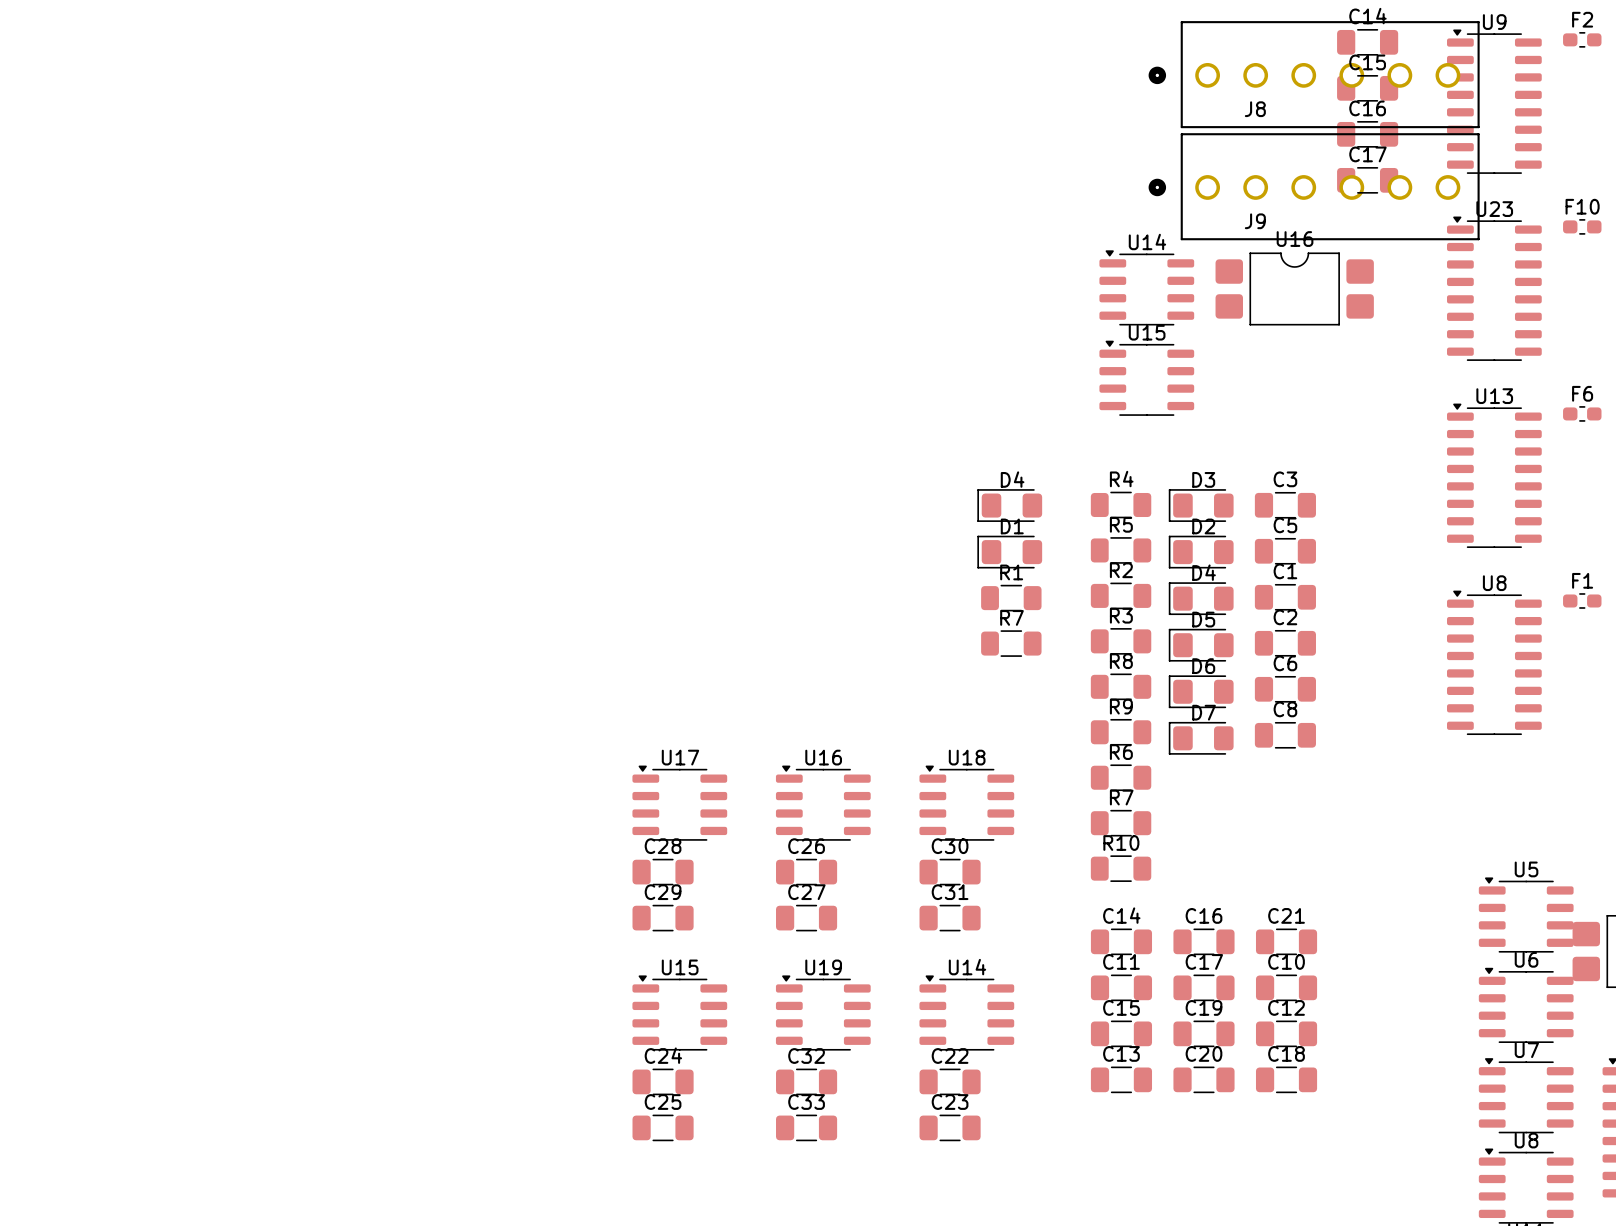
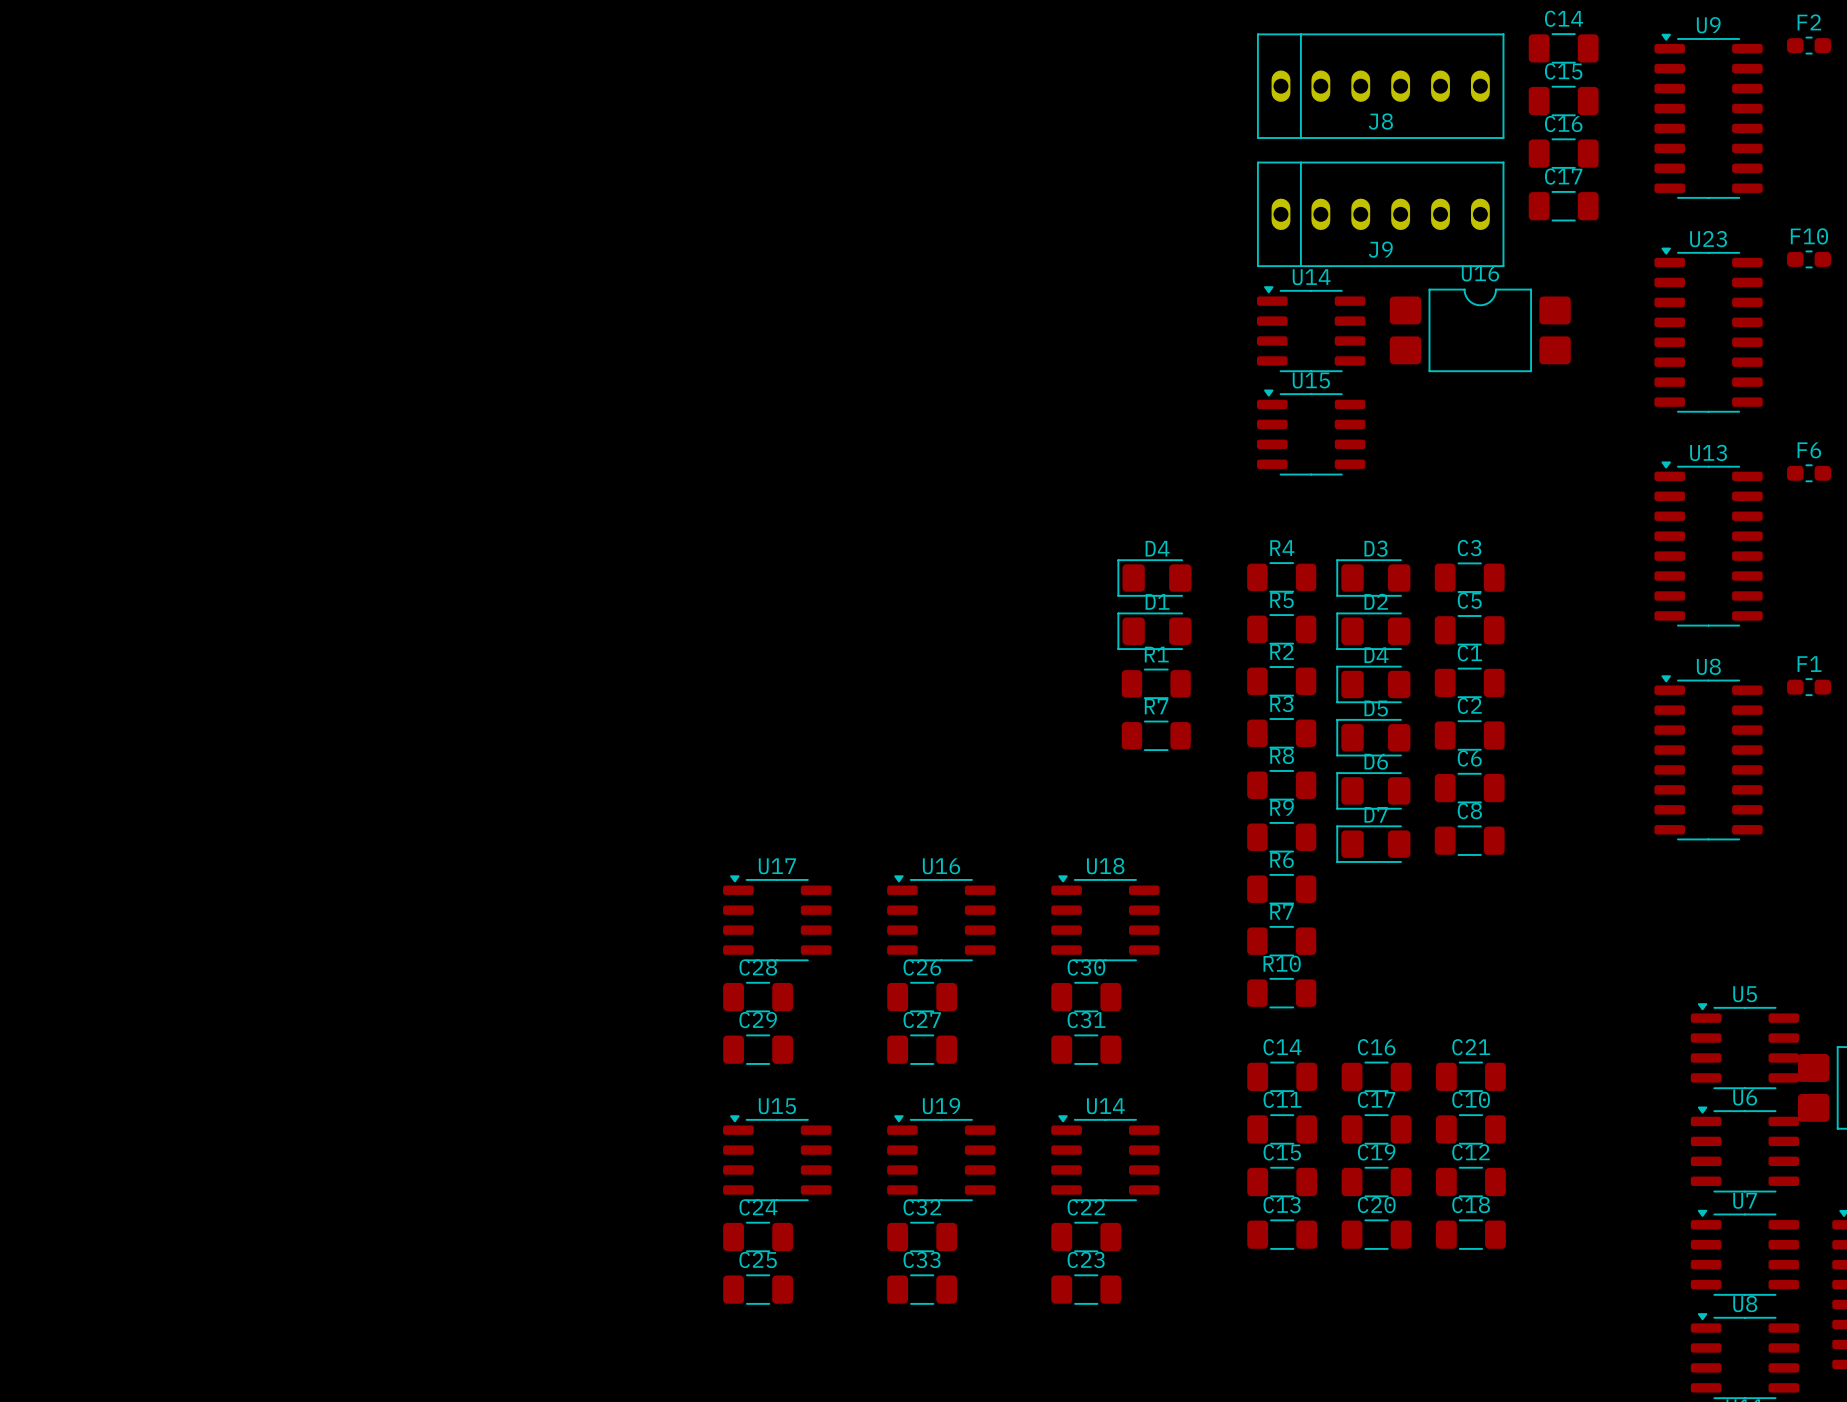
J8 footprint: [1148, 21, 1480, 129] -> [1256, 33, 1505, 139]
J8 name position: J8 (1255, 109) -> J8 (1380, 121)
J9 footprint: [1148, 133, 1480, 241] -> [1256, 161, 1505, 268]
J9 name position: J9 (1255, 221) -> J9 (1380, 249)

